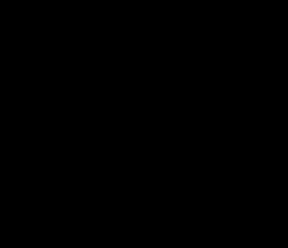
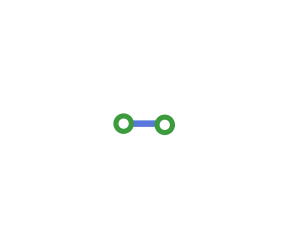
track: none -> (123, 123) (164, 124)
via: none -> (123, 123)
via: none -> (164, 124)

